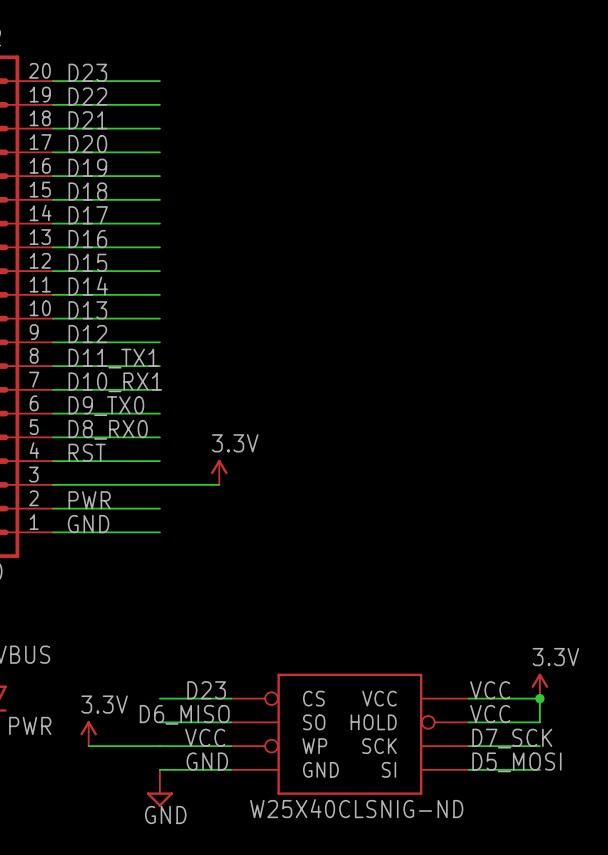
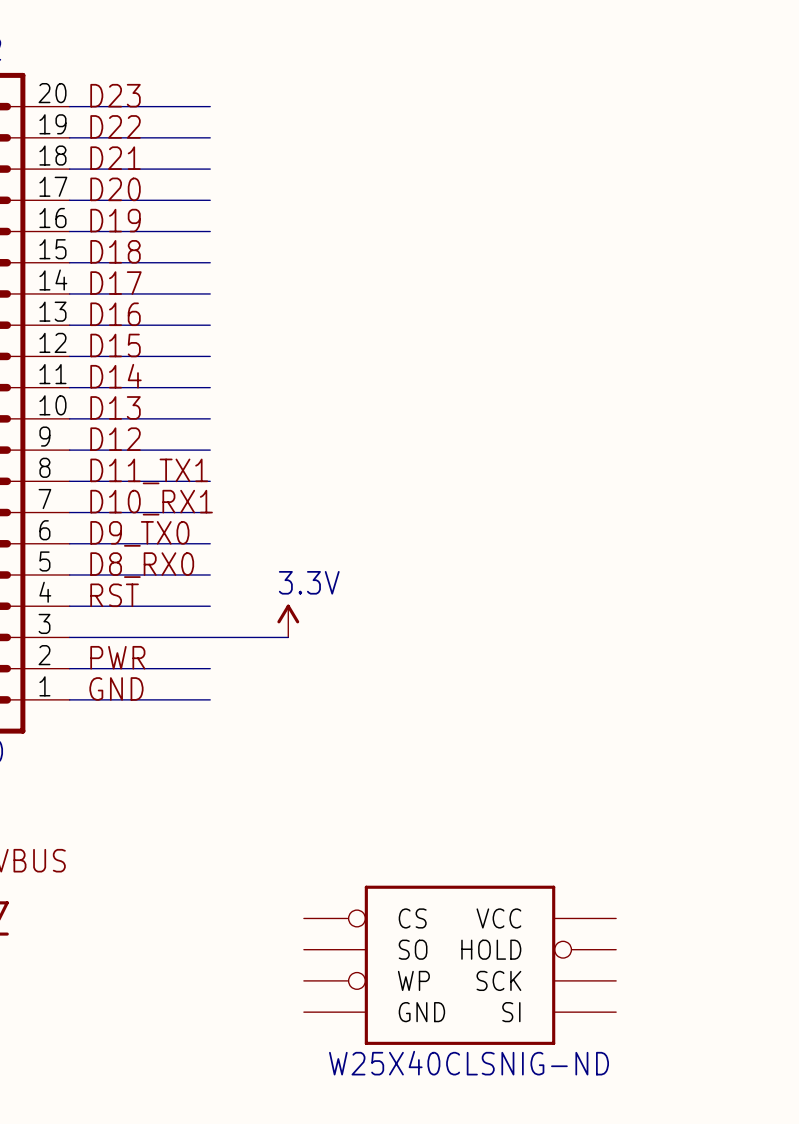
power symbol: 3.3V (539, 686) -> none
label: D23 (206, 690) -> none
label: VCC (490, 690) -> none
wire: (159, 698) (231, 698) -> none
wire: (468, 698) (539, 698) (539, 722) (468, 722) -> none
junction: (539, 698) -> none
label: D6_MISO (184, 714) -> none
label: VCC (490, 714) -> none
wire: (159, 722) (231, 722) -> none
label: PWR (30, 725) -> none
power symbol: 3.3V (88, 733) -> none
label: VCC (205, 737) -> none
label: D7_SCK (512, 738) -> none
wire: (88, 746) (231, 746) -> none
wire: (468, 746) (539, 746) -> none
label: GND (207, 761) -> none
label: D5_MOSI (516, 762) -> none
wire: (159, 769) (231, 769) -> none
wire: (468, 769) (539, 769) -> none
power symbol: GND (159, 788) -> none

